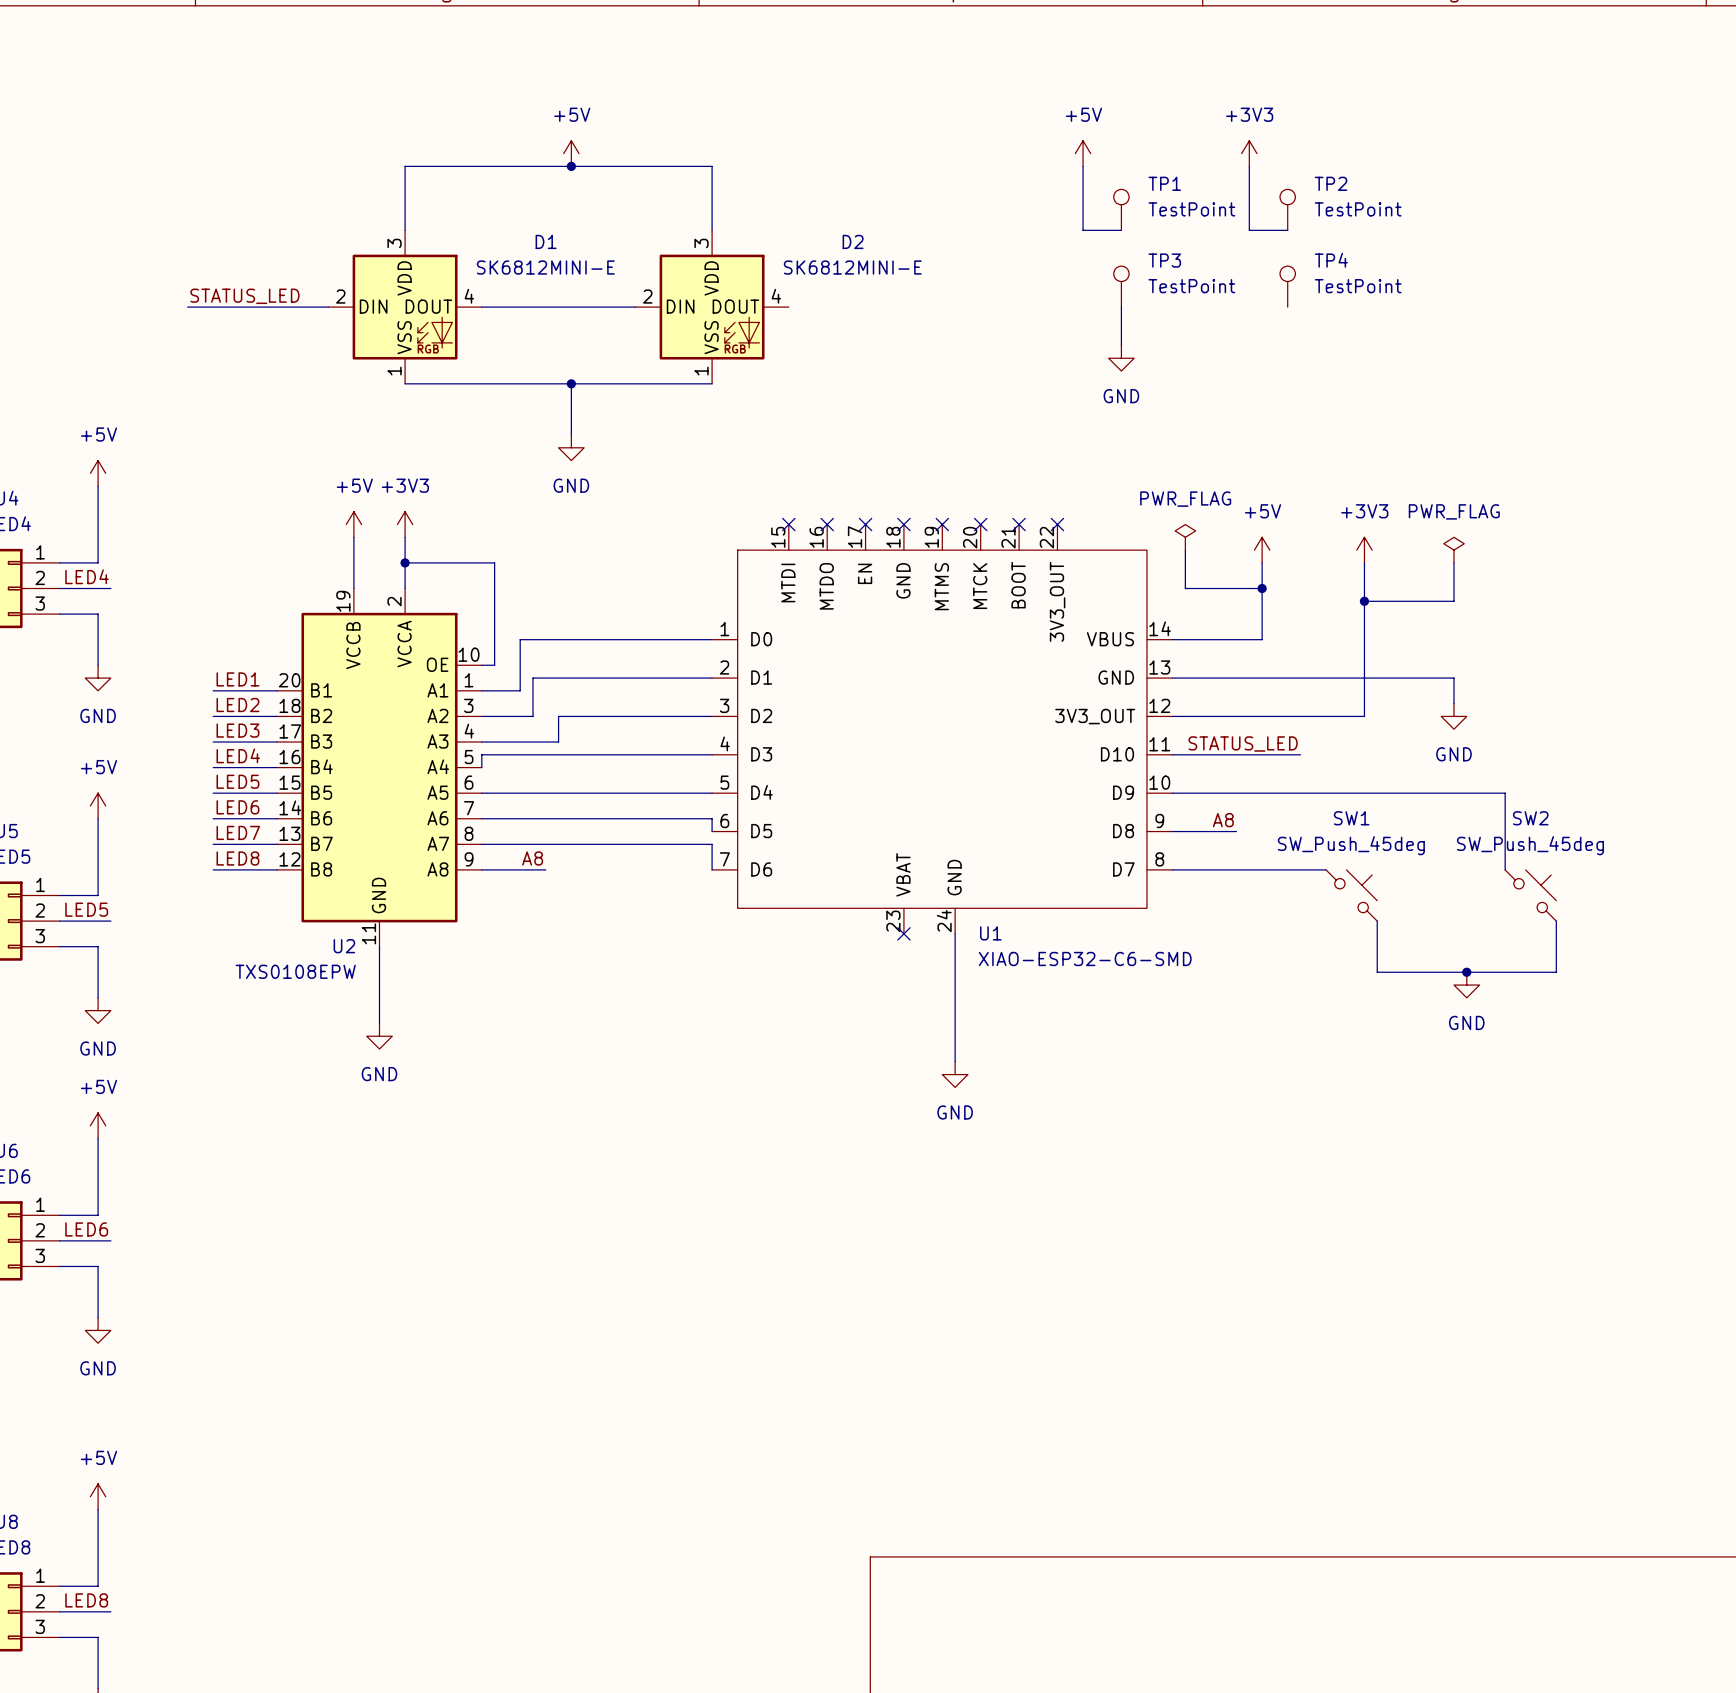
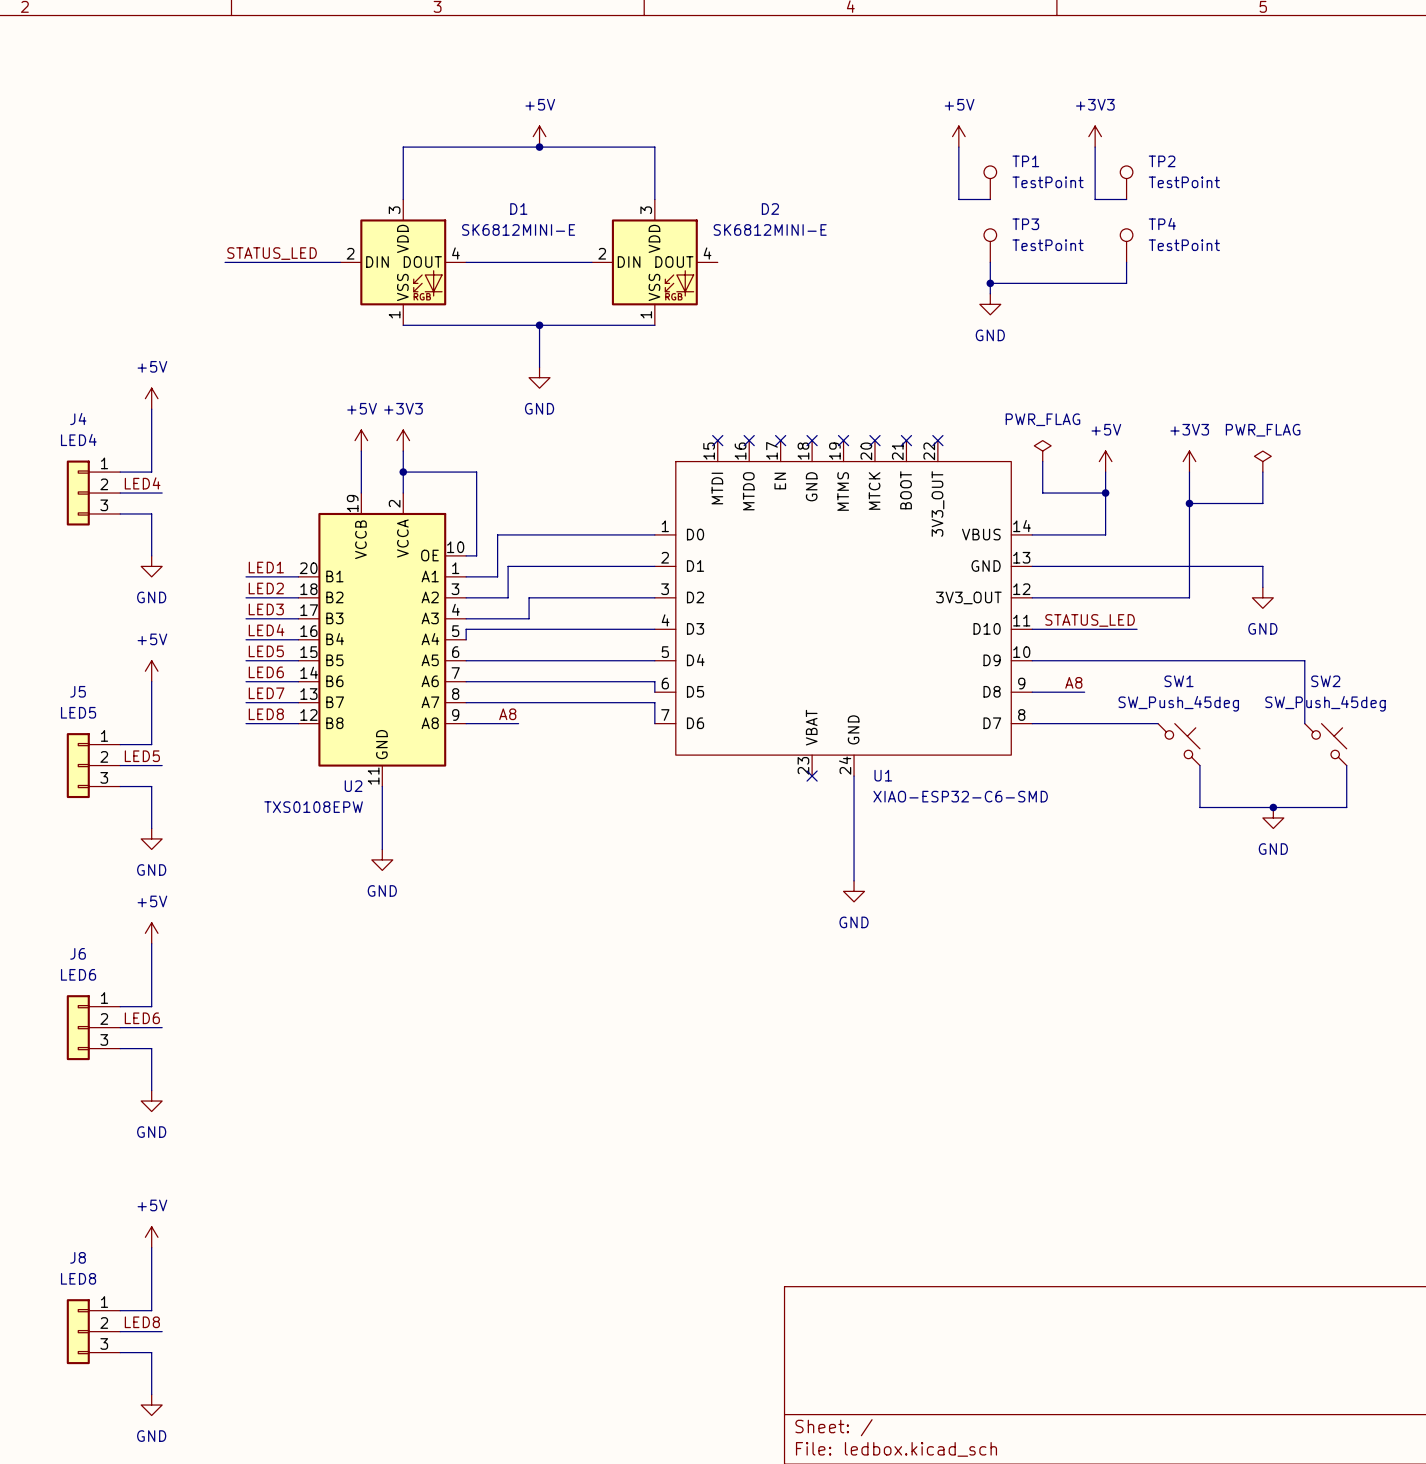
wire: none -> (1126, 262) (1126, 283) (990, 283)
junction: none -> (990, 283)

